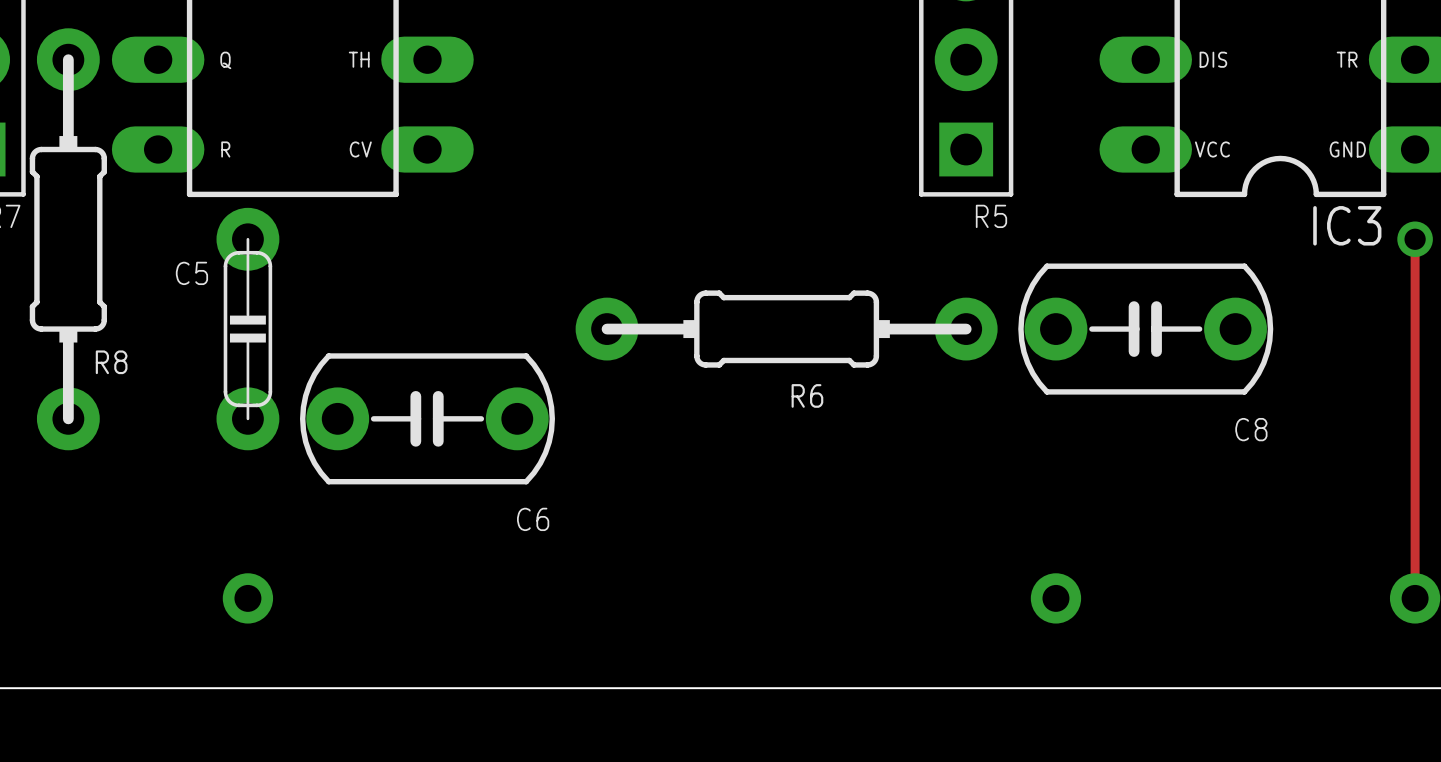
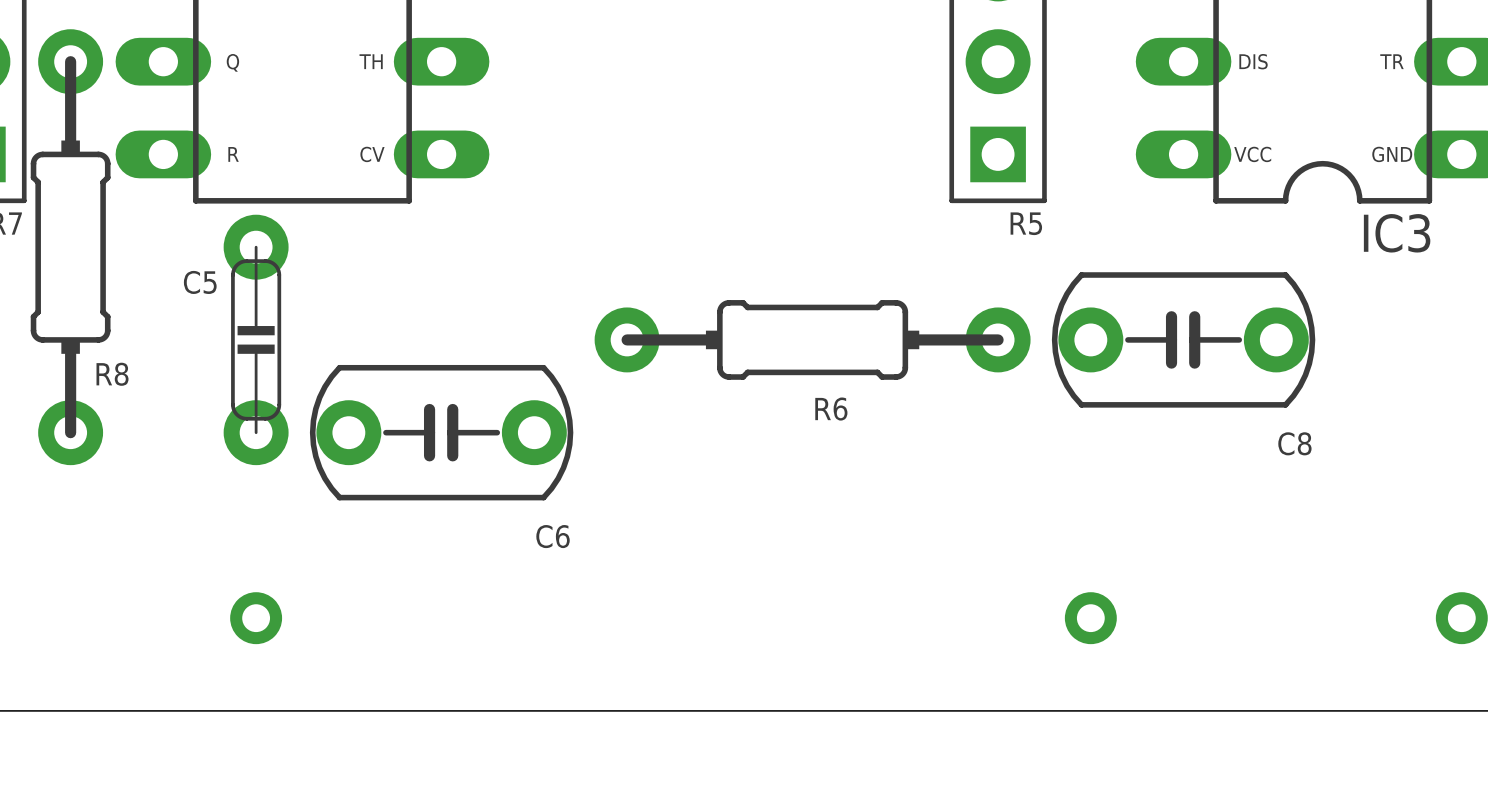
track: (1415, 239) (1415, 598) -> none
via: (1415, 239) -> none

